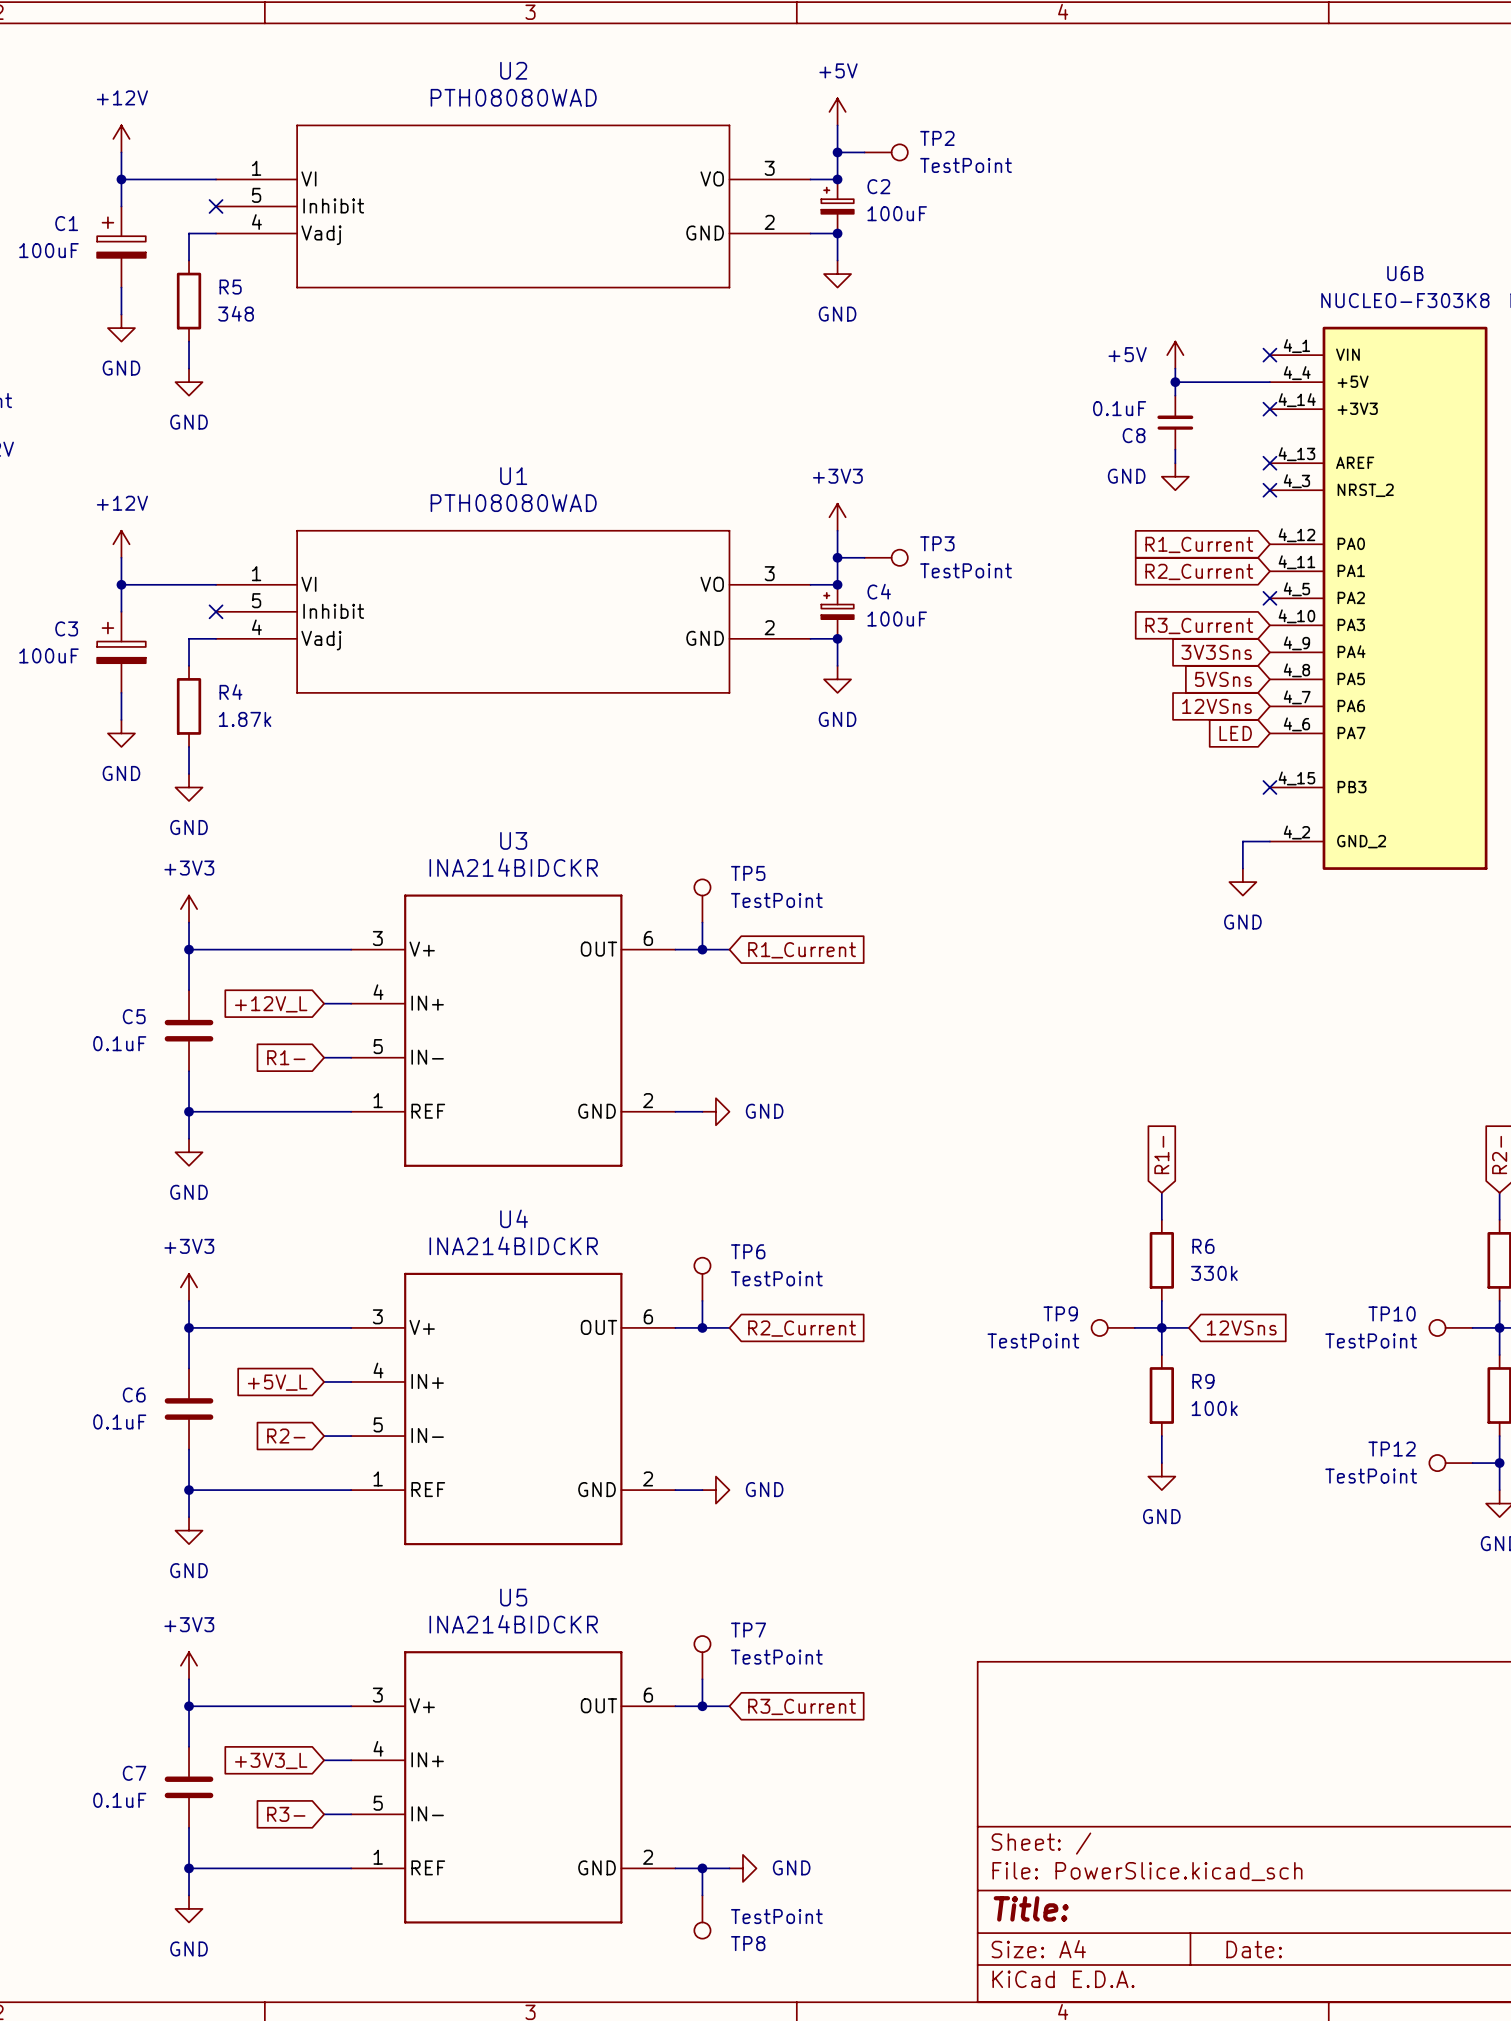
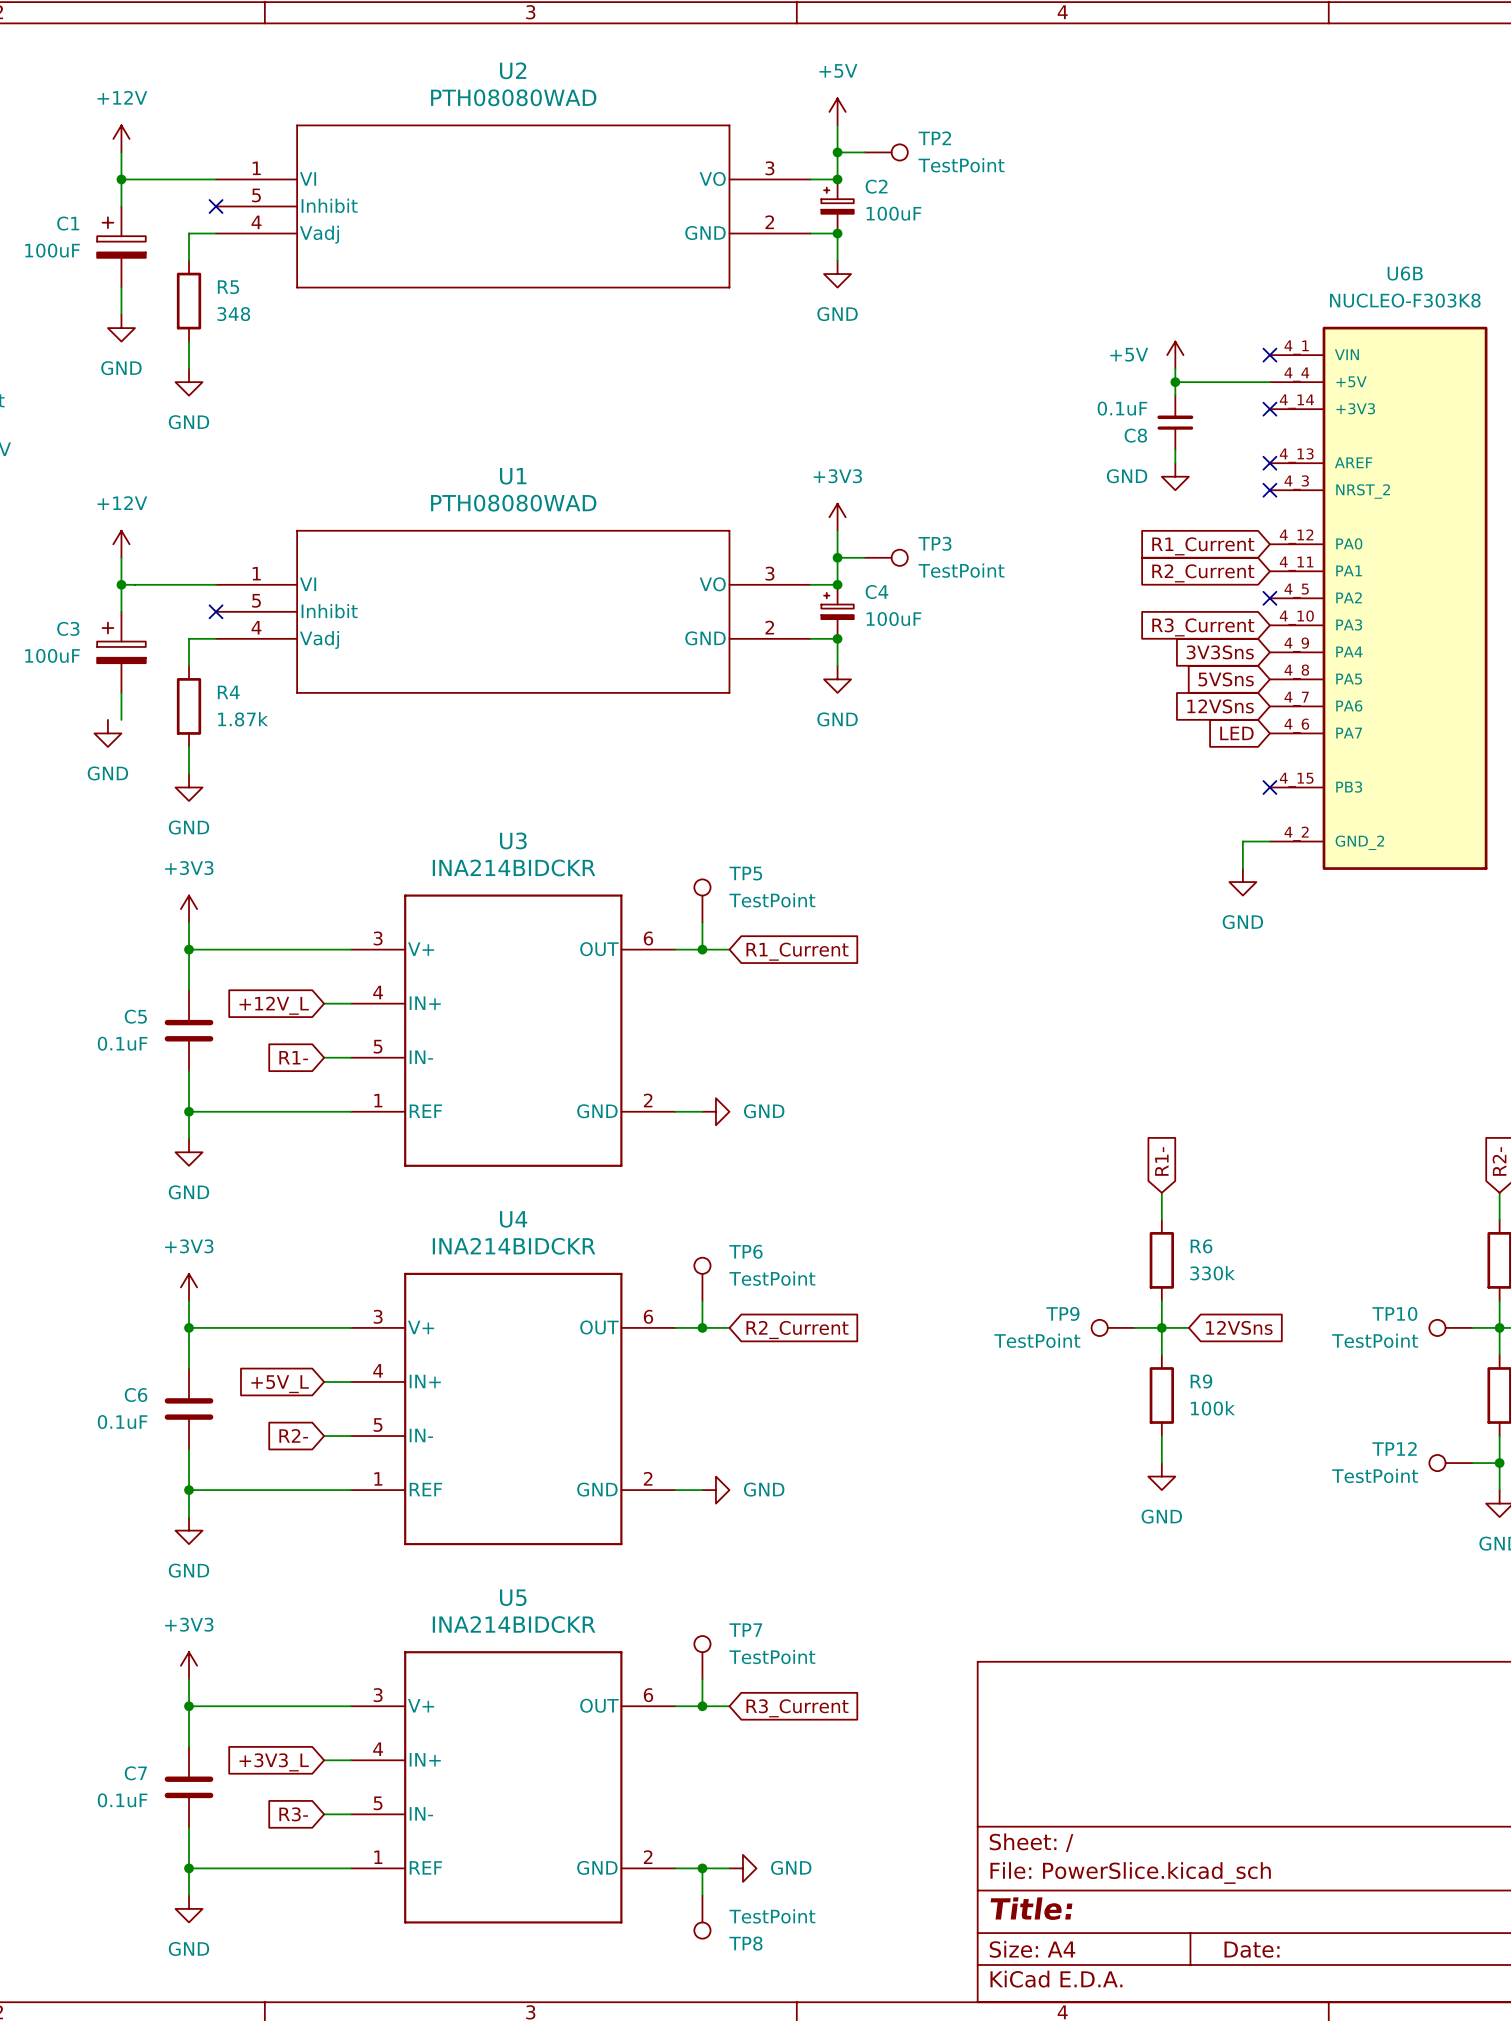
power symbol position: GND (121, 733) -> GND (107, 733)

